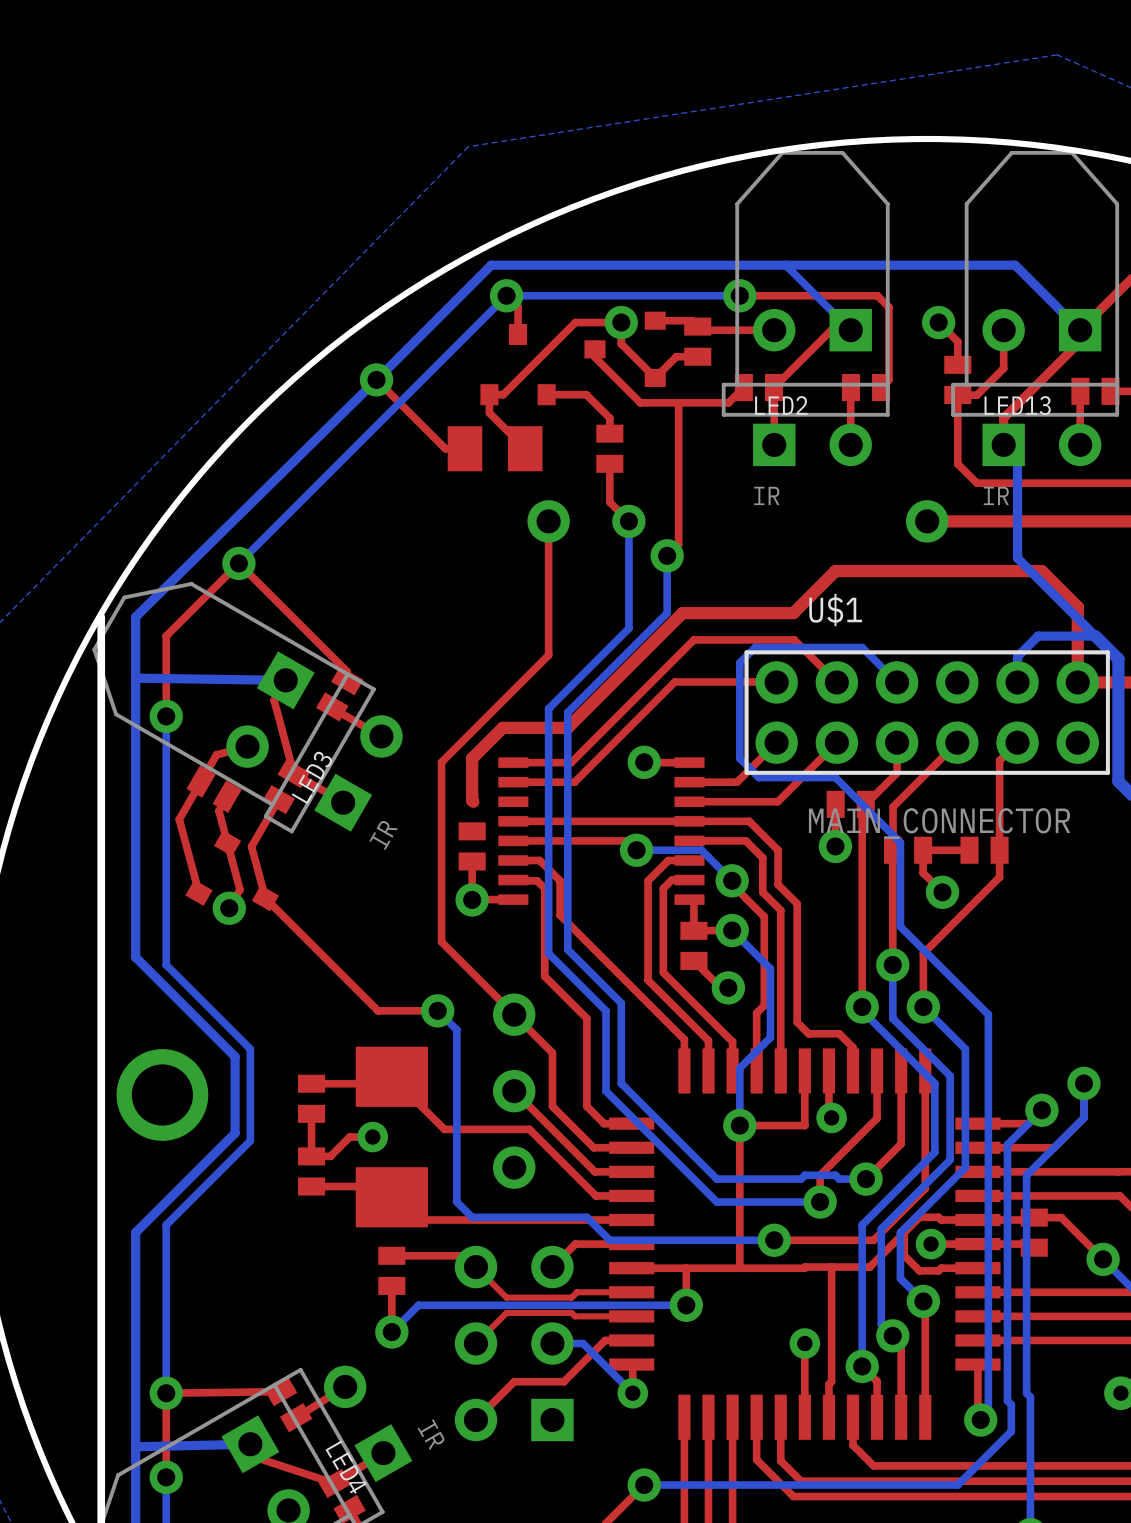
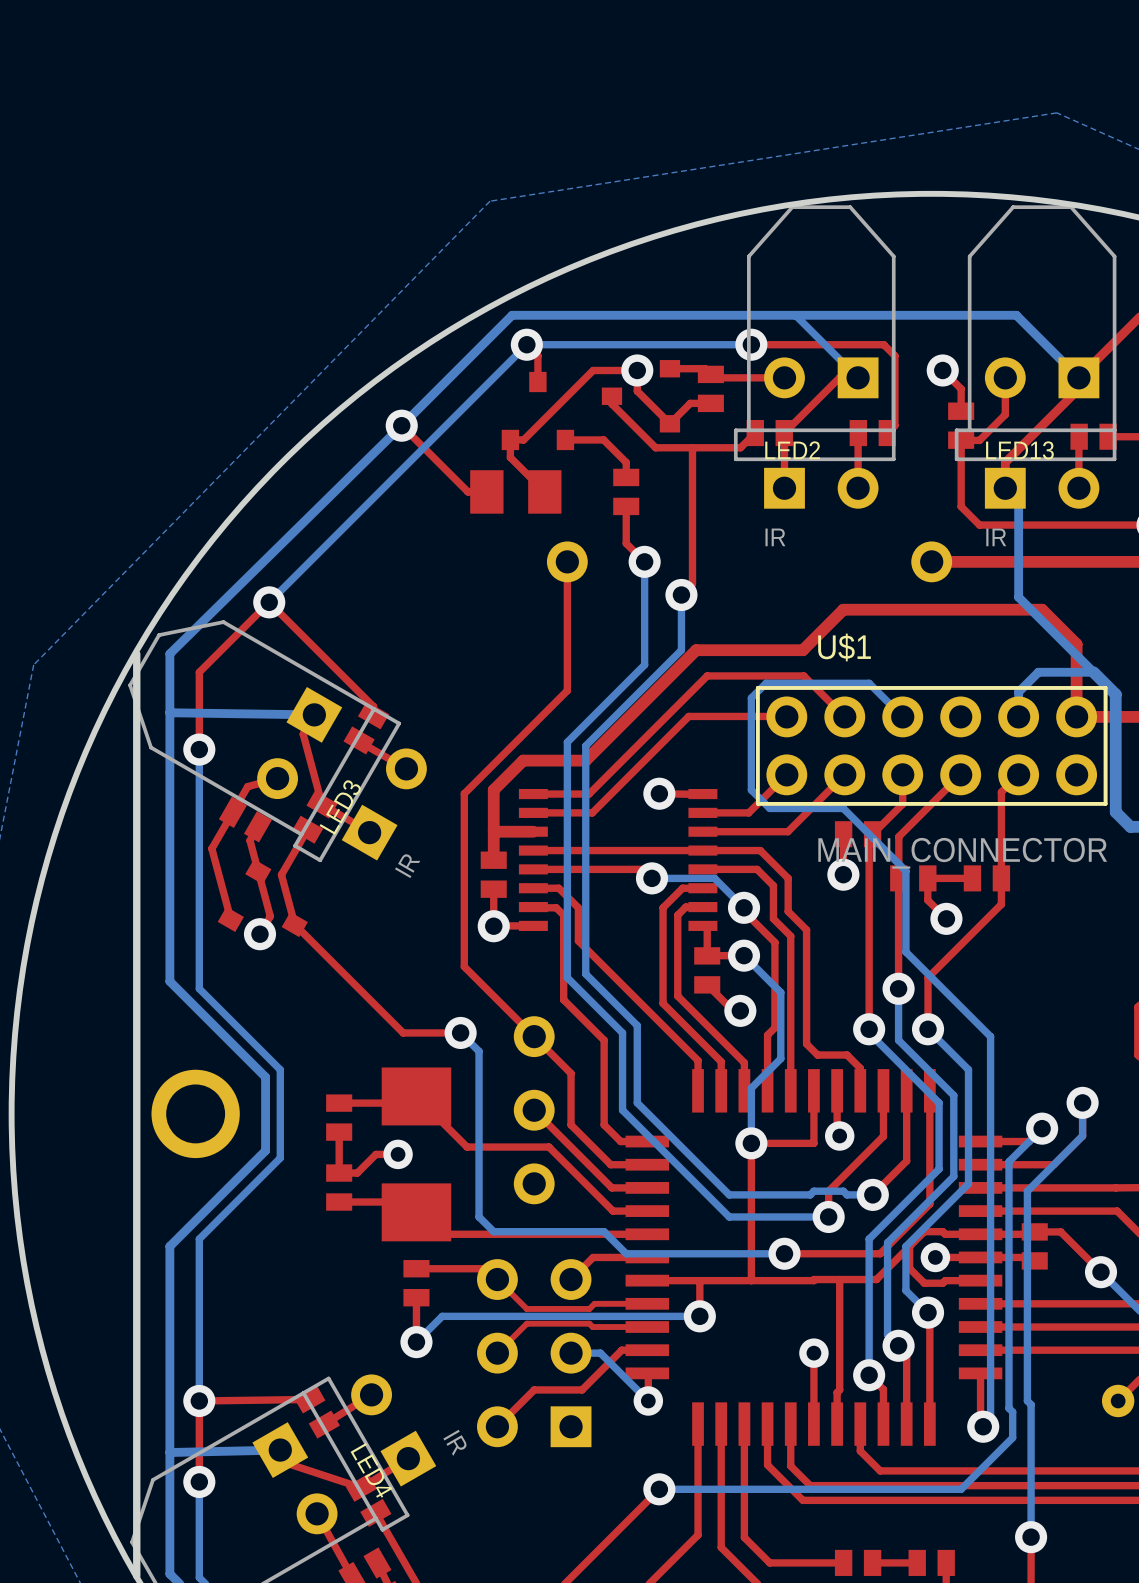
top track: none -> (493, 830) (493, 860)
top track: none -> (533, 831) (494, 831)

